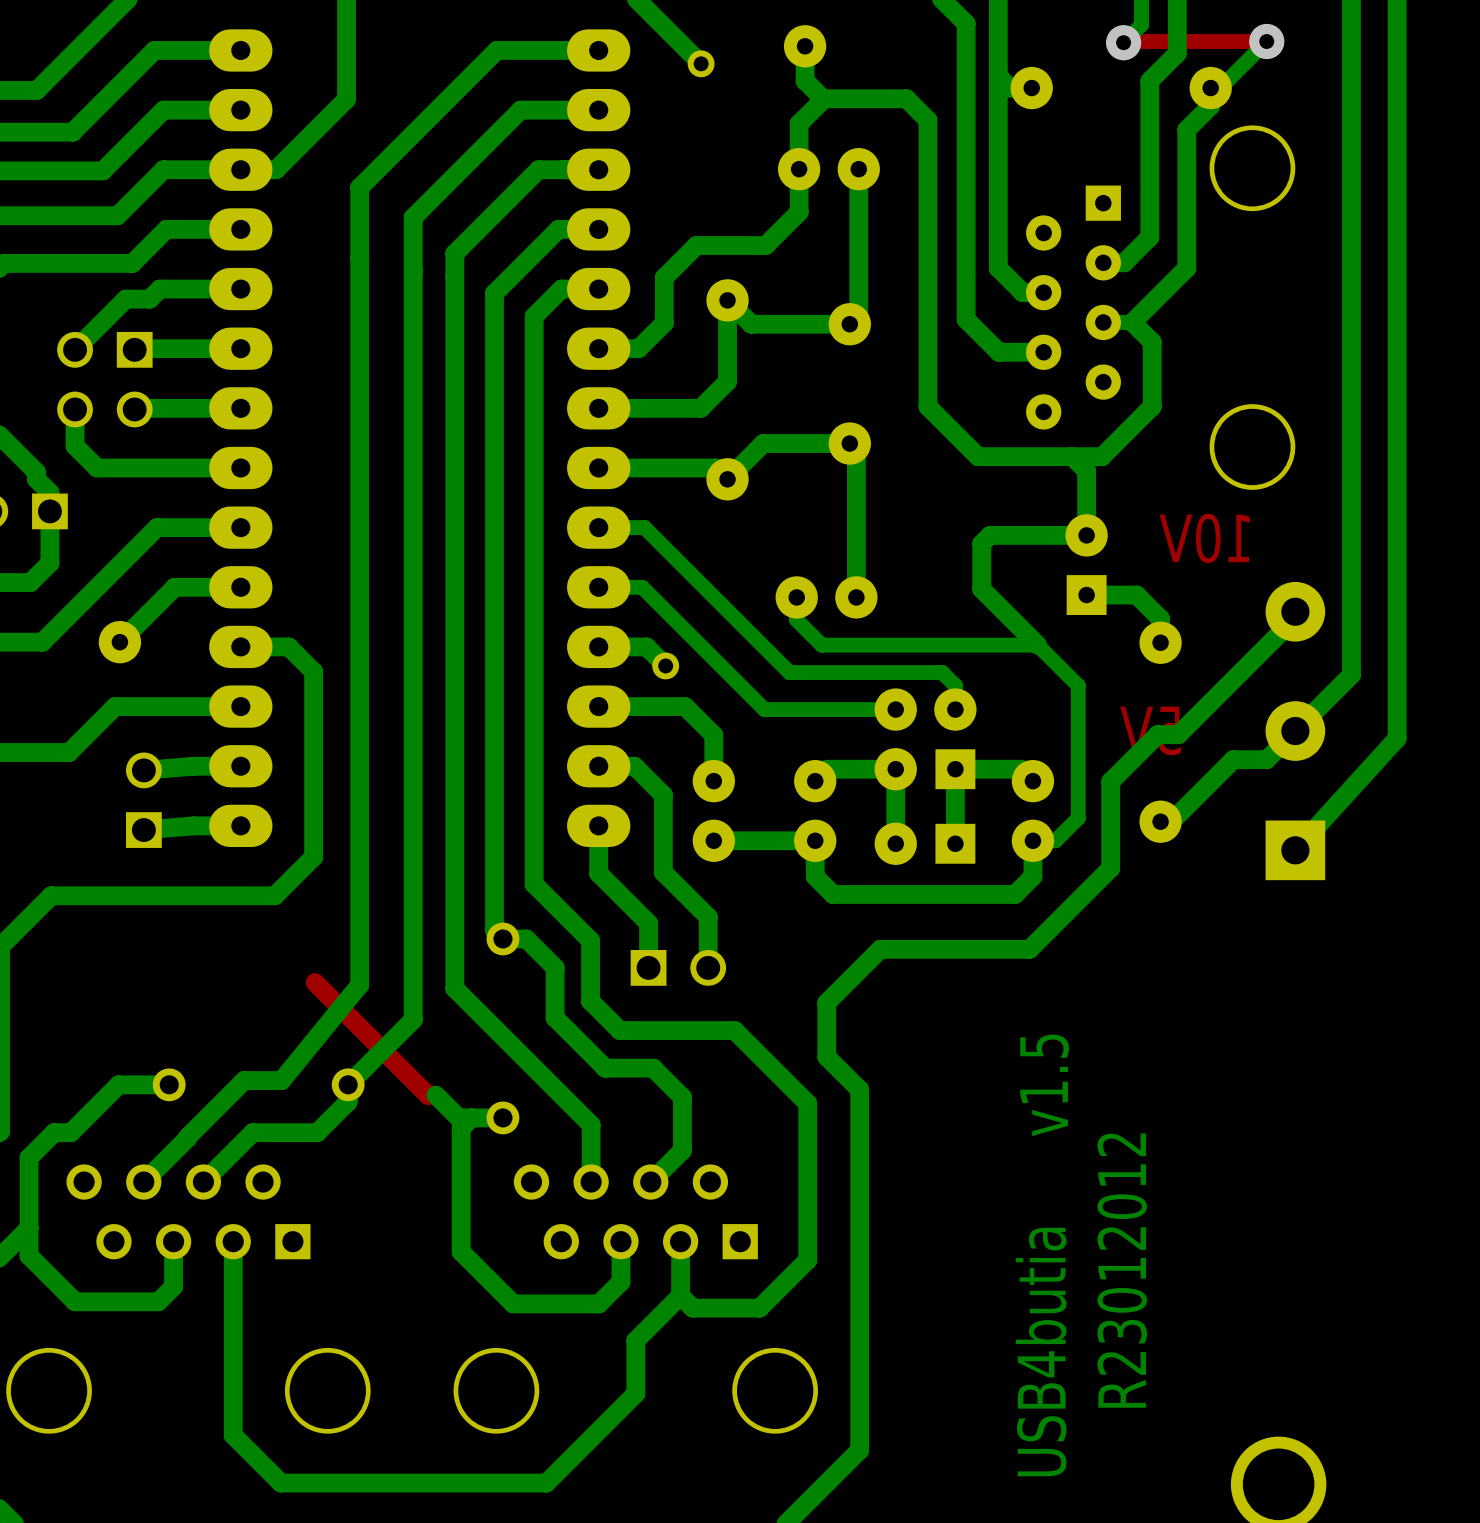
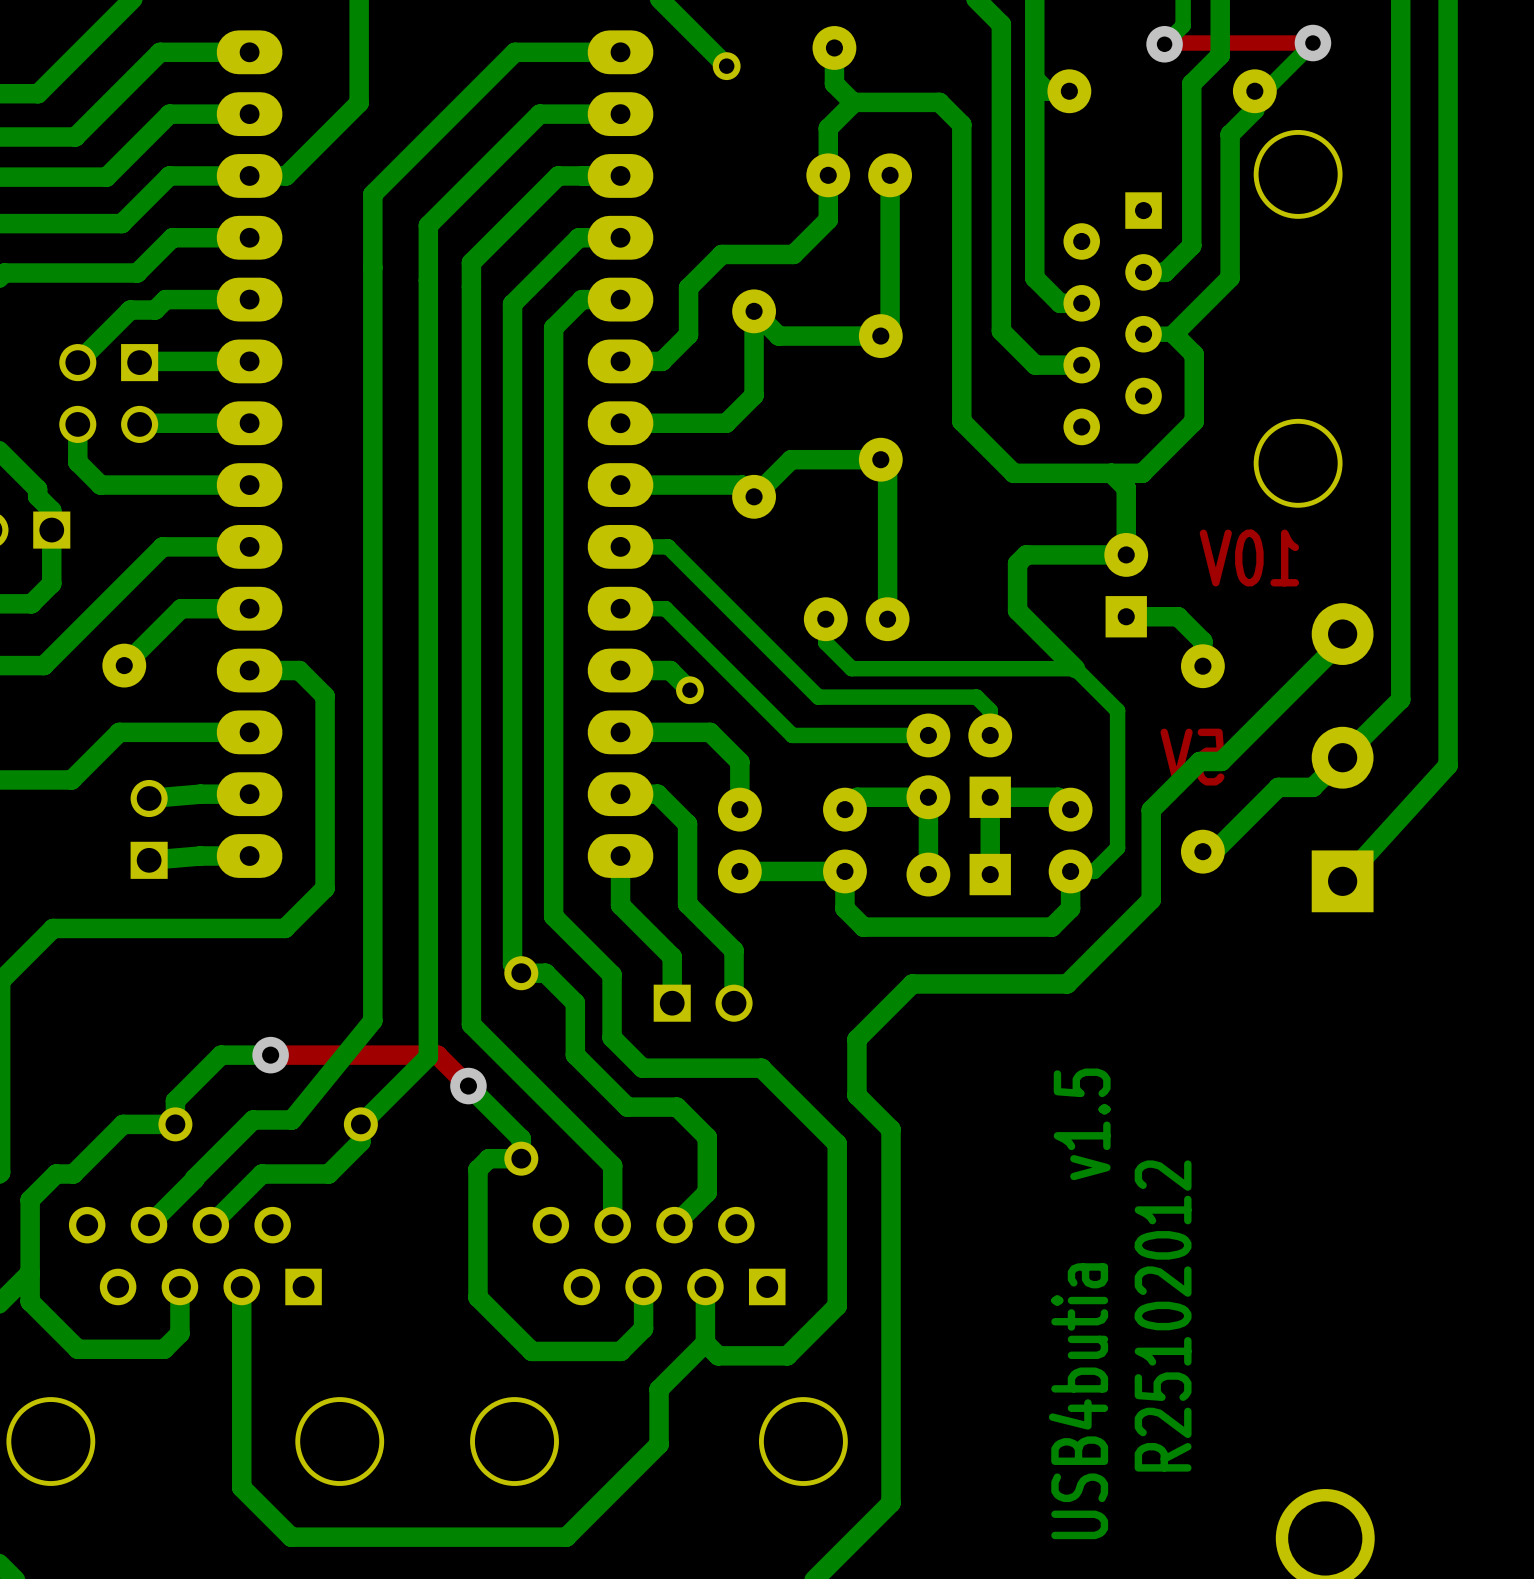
top track: (315, 982) (427, 1095) (434, 1095) -> none
top track: none -> (270, 1055) (437, 1055) (468, 1086)
bottom track: none -> (270, 1055) (221, 1055) (175, 1100) (175, 1124)
via: none -> (270, 1055)
bottom track: none -> (468, 1086) (521, 1138) (521, 1158)
via: none -> (468, 1086)
bottom track: (435, 1095) (458, 1117) (471, 1117) -> none
text: R23012012 (1122, 1270) -> R25102012 (1163, 1316)

